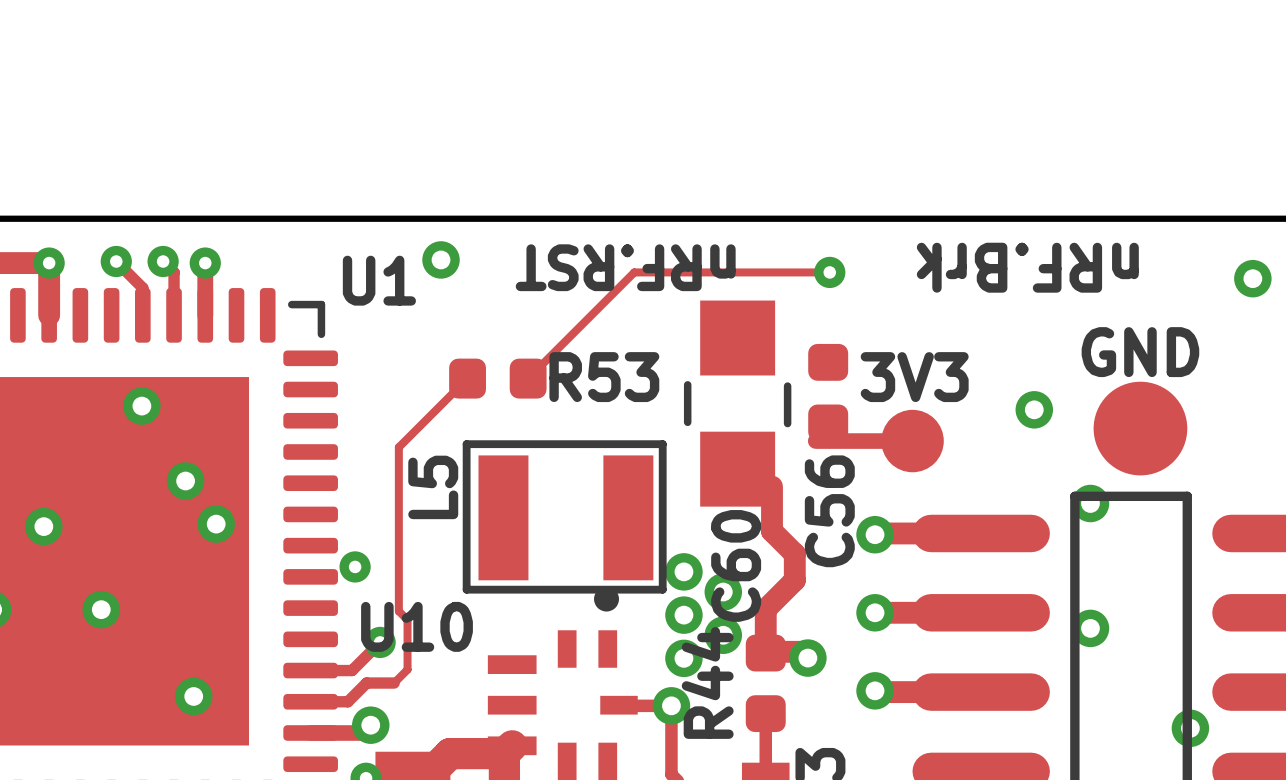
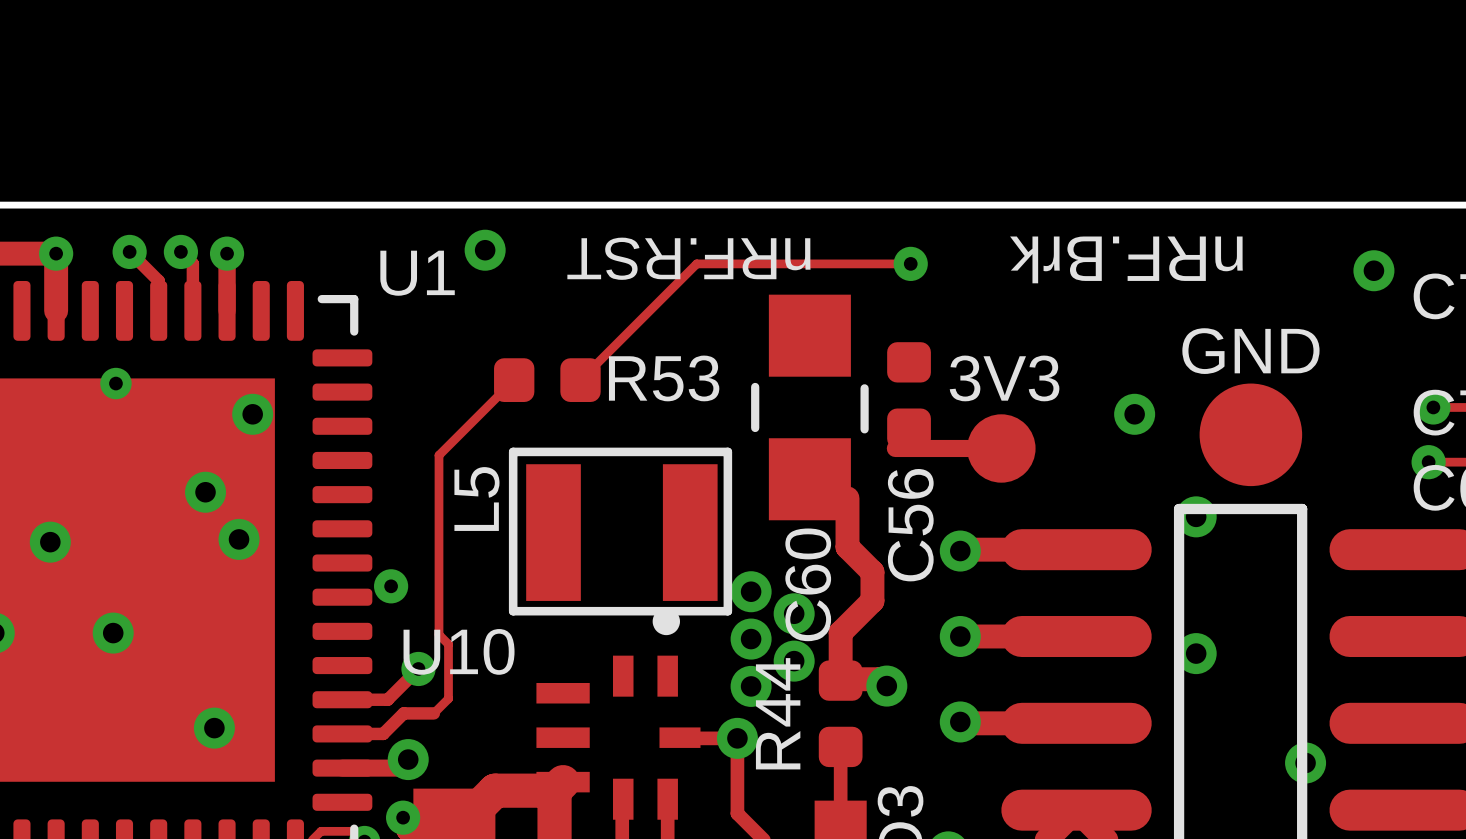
via: none -> (115, 383)
via position: (141, 406) -> (252, 414)

